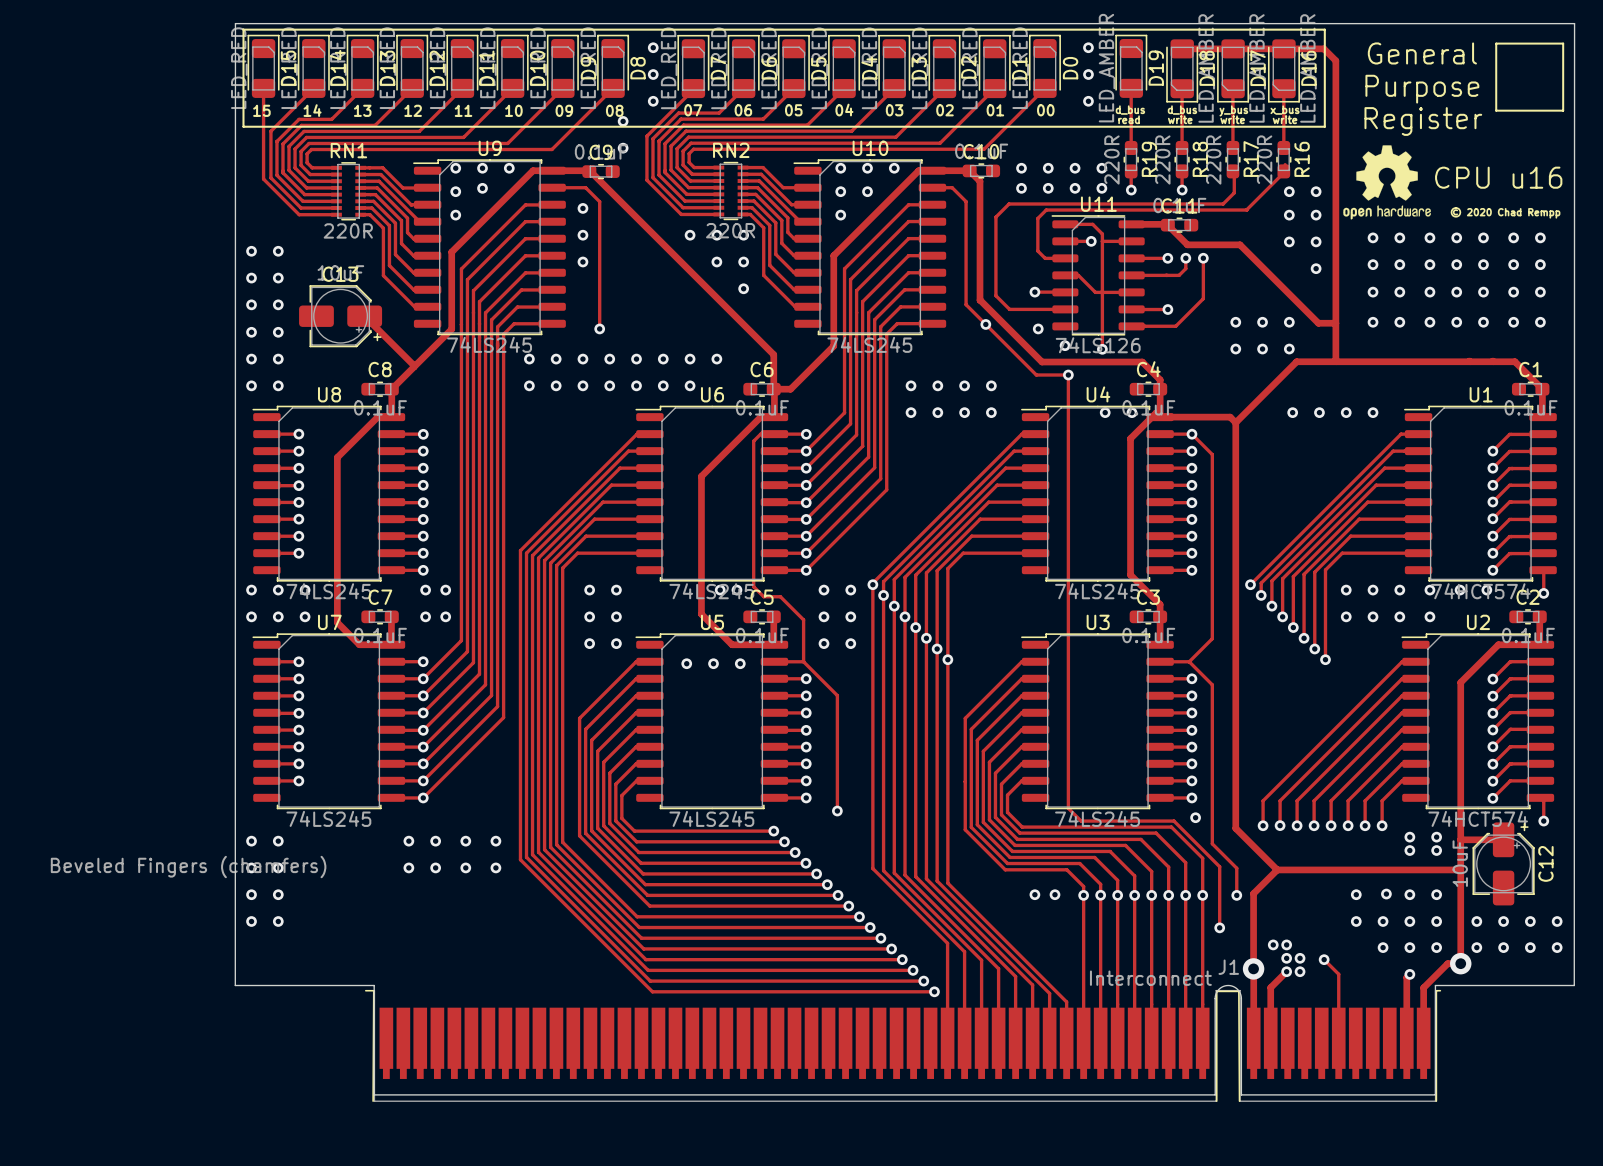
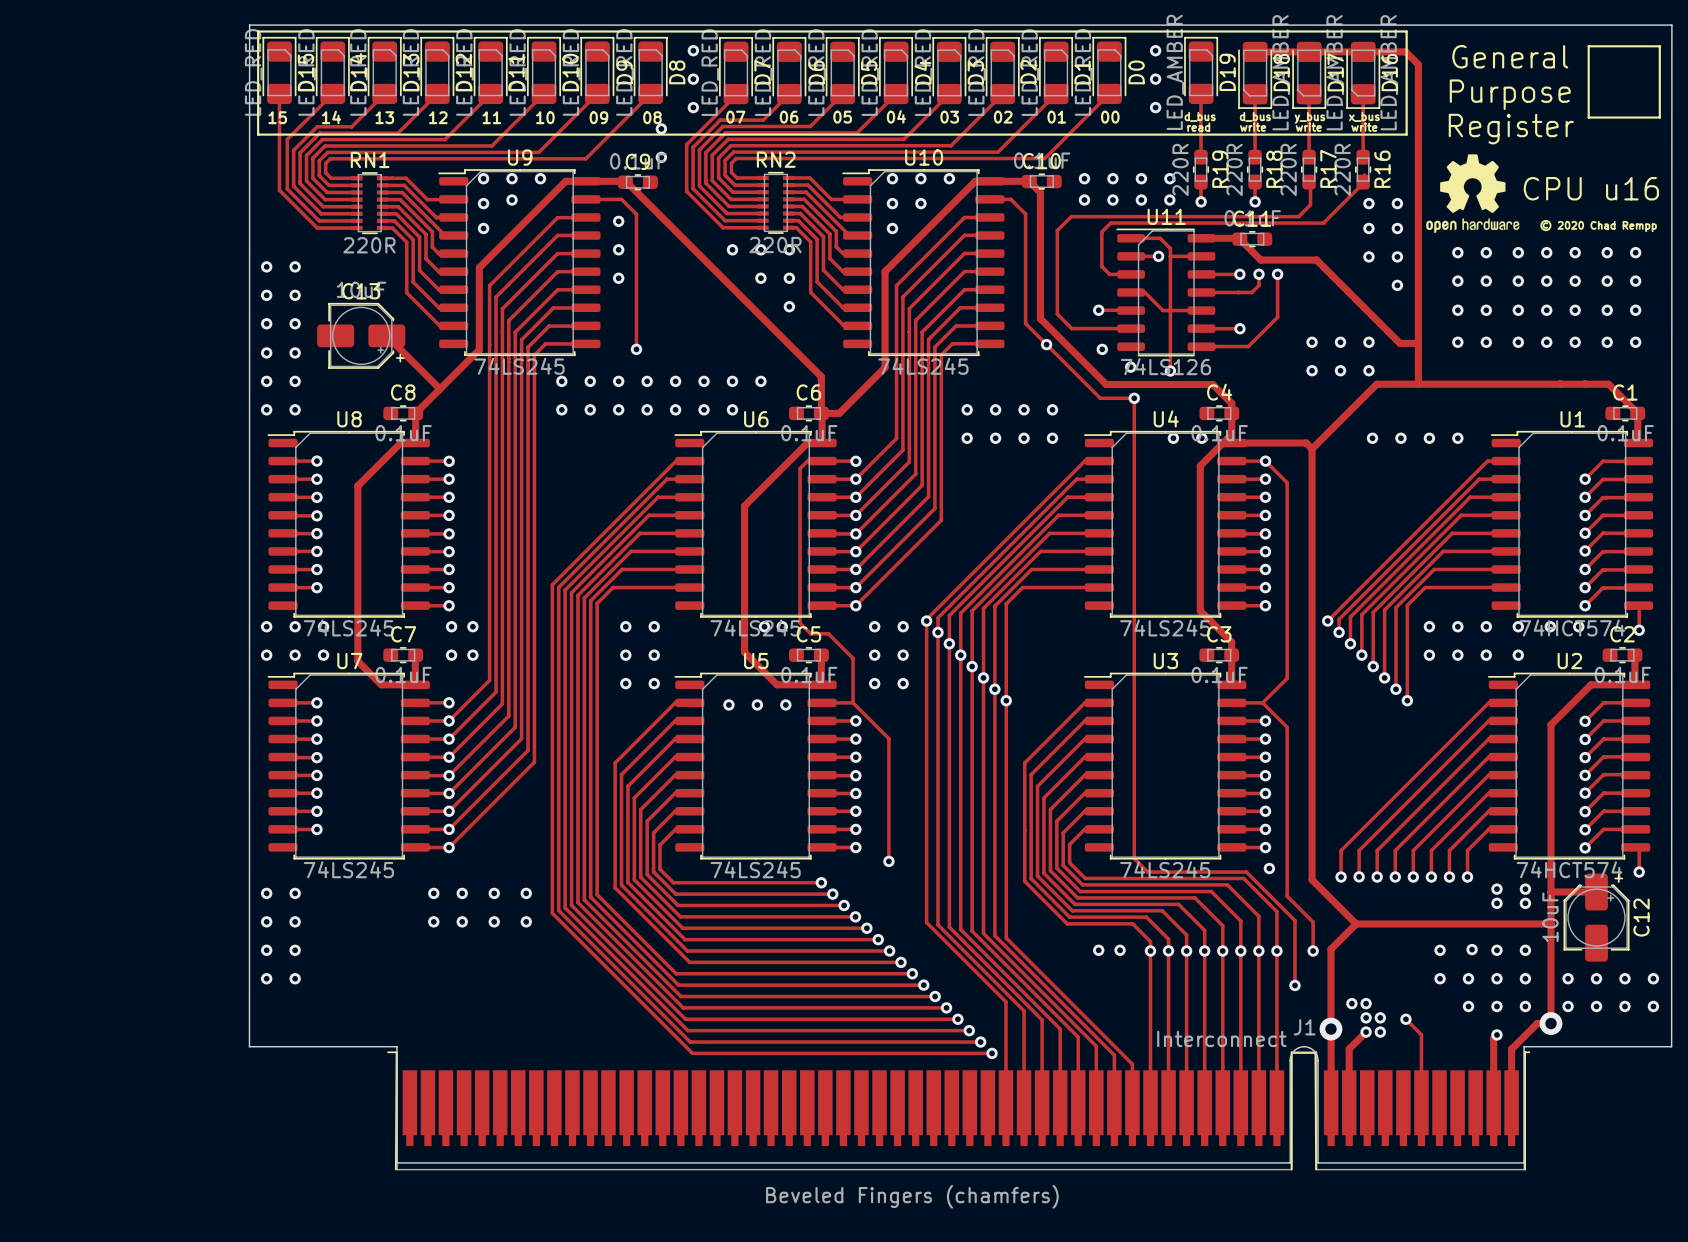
text: Beveled Fingers (chamfers) (188, 867) -> none
text: none -> Beveled Fingers (chamfers) (912, 1196)

